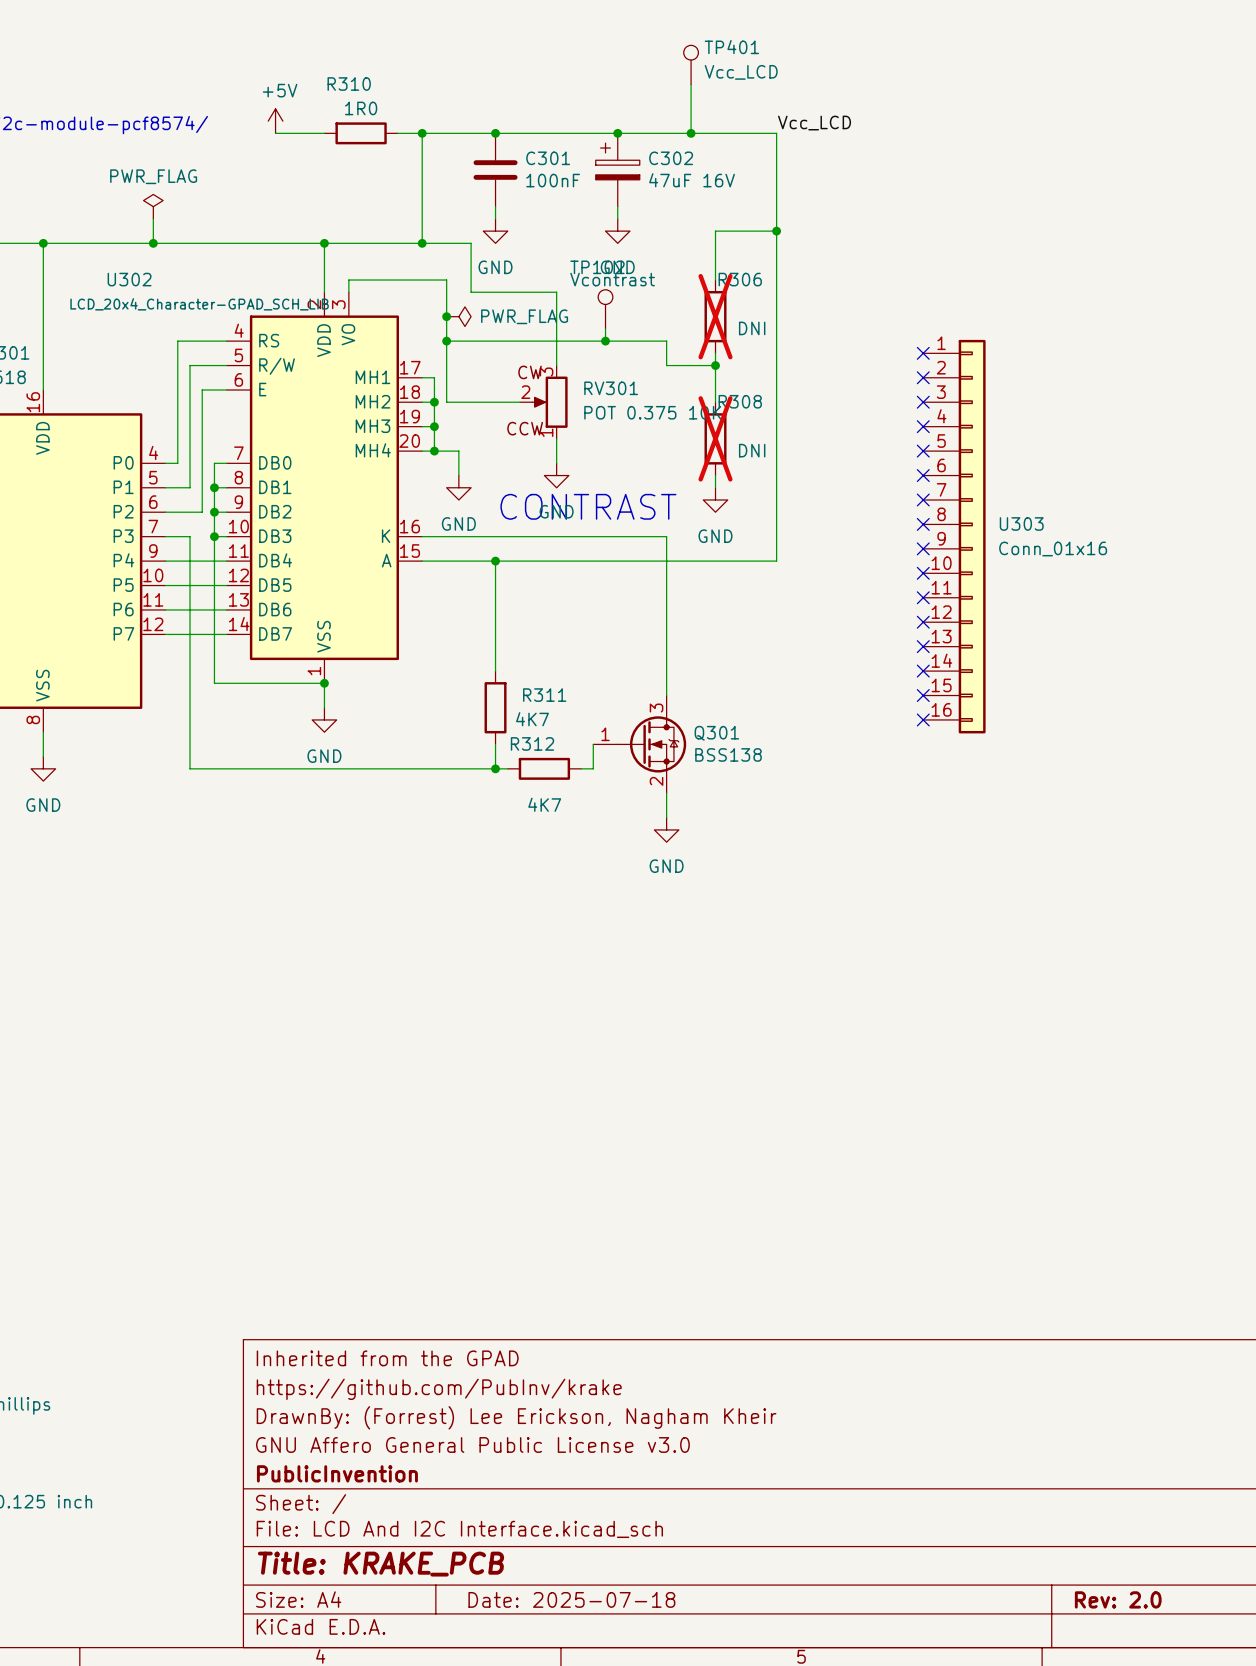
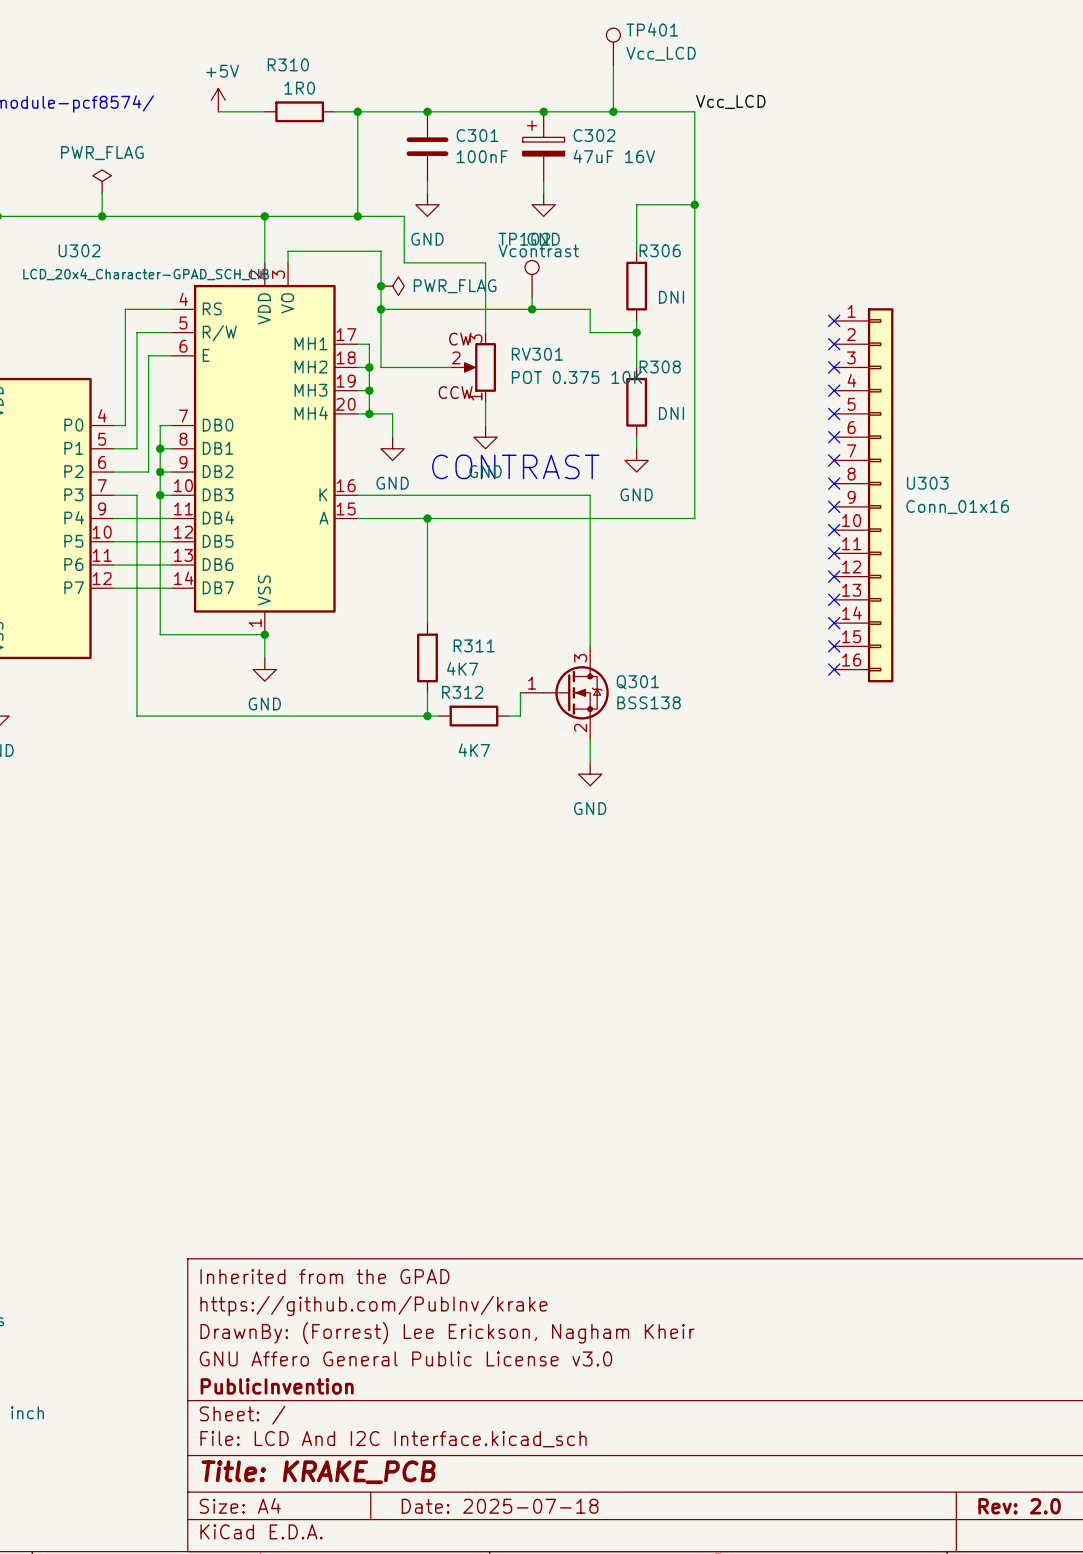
R306 do-not-place cross: (715, 316) -> none
R308 do-not-place cross: (715, 438) -> none

